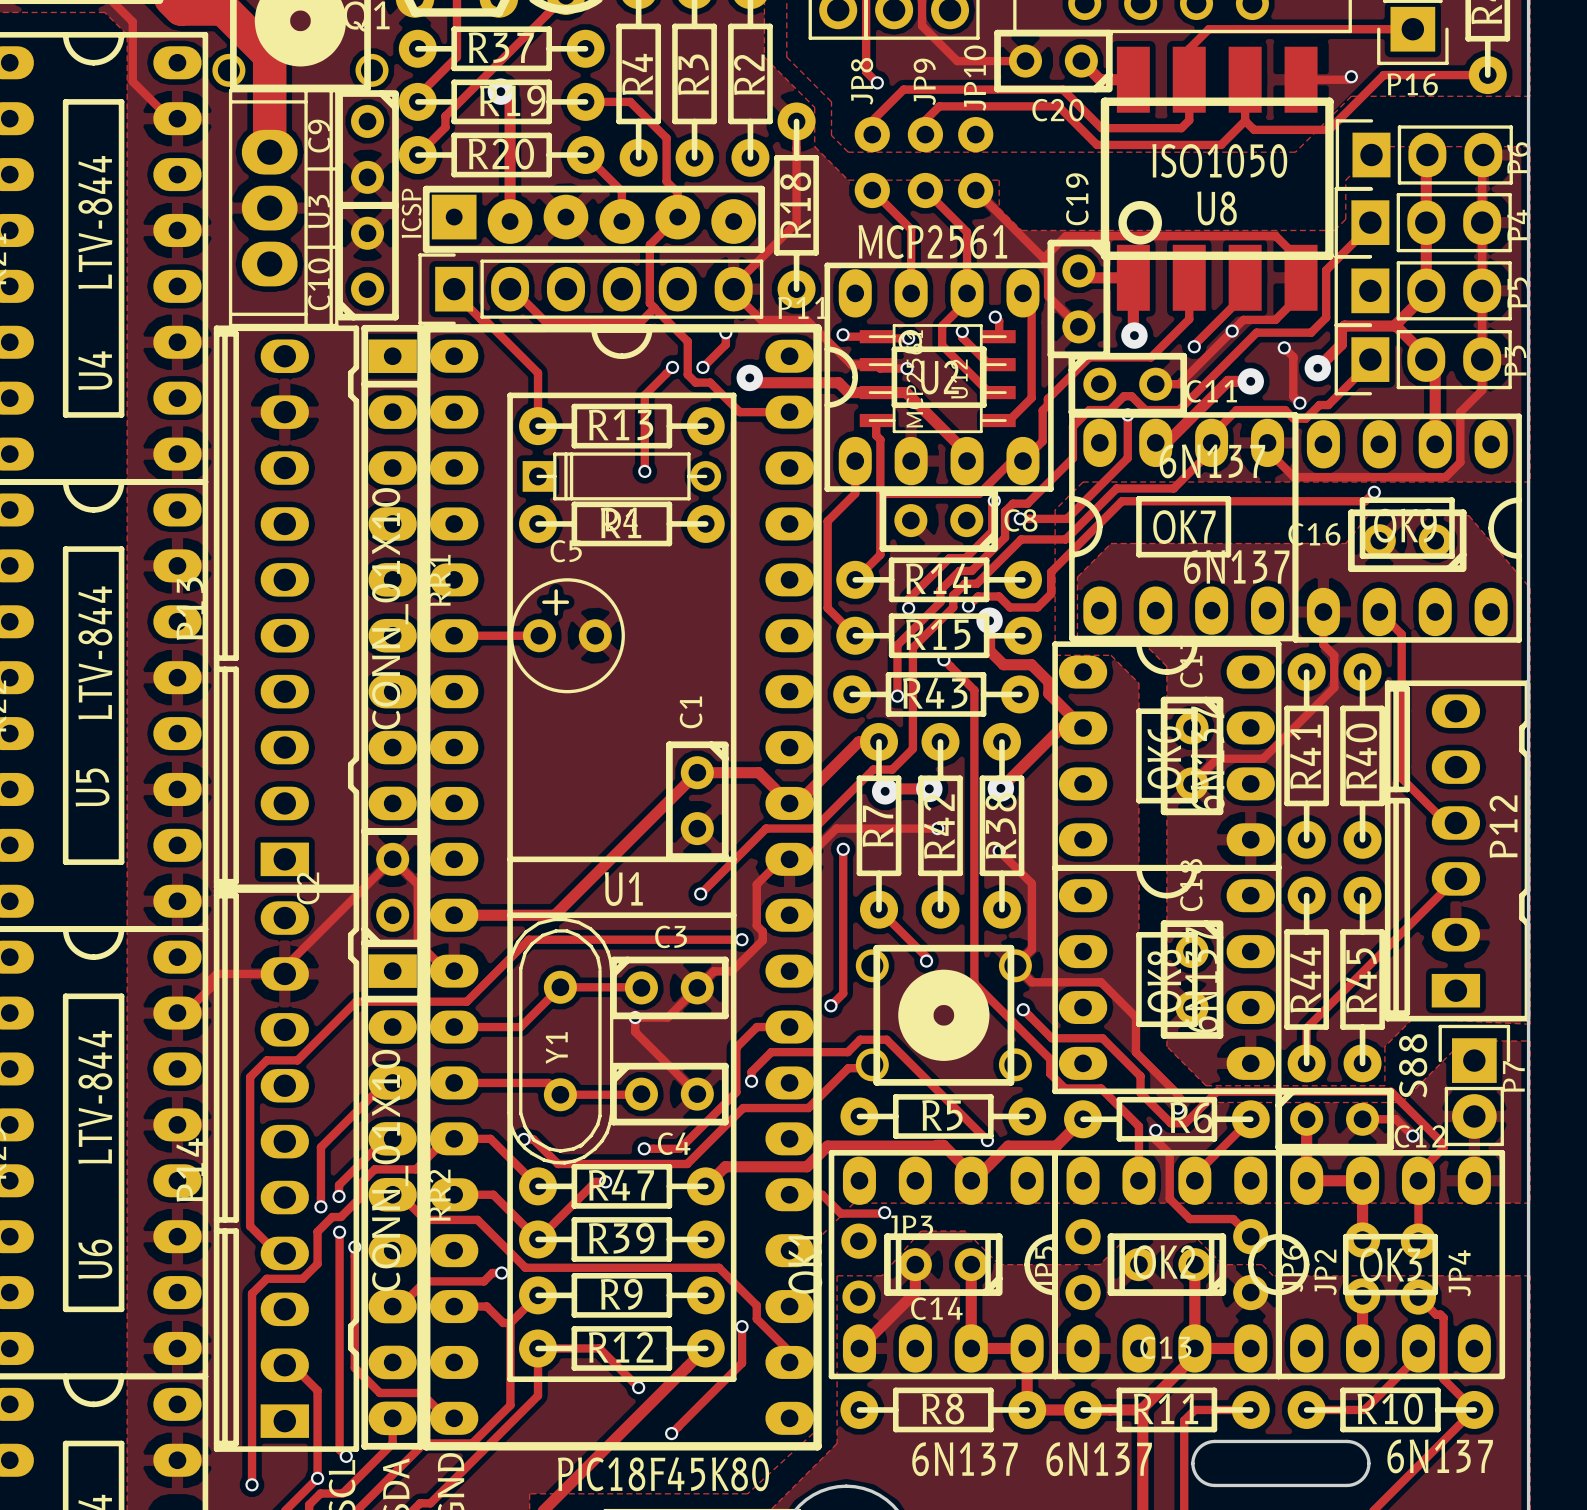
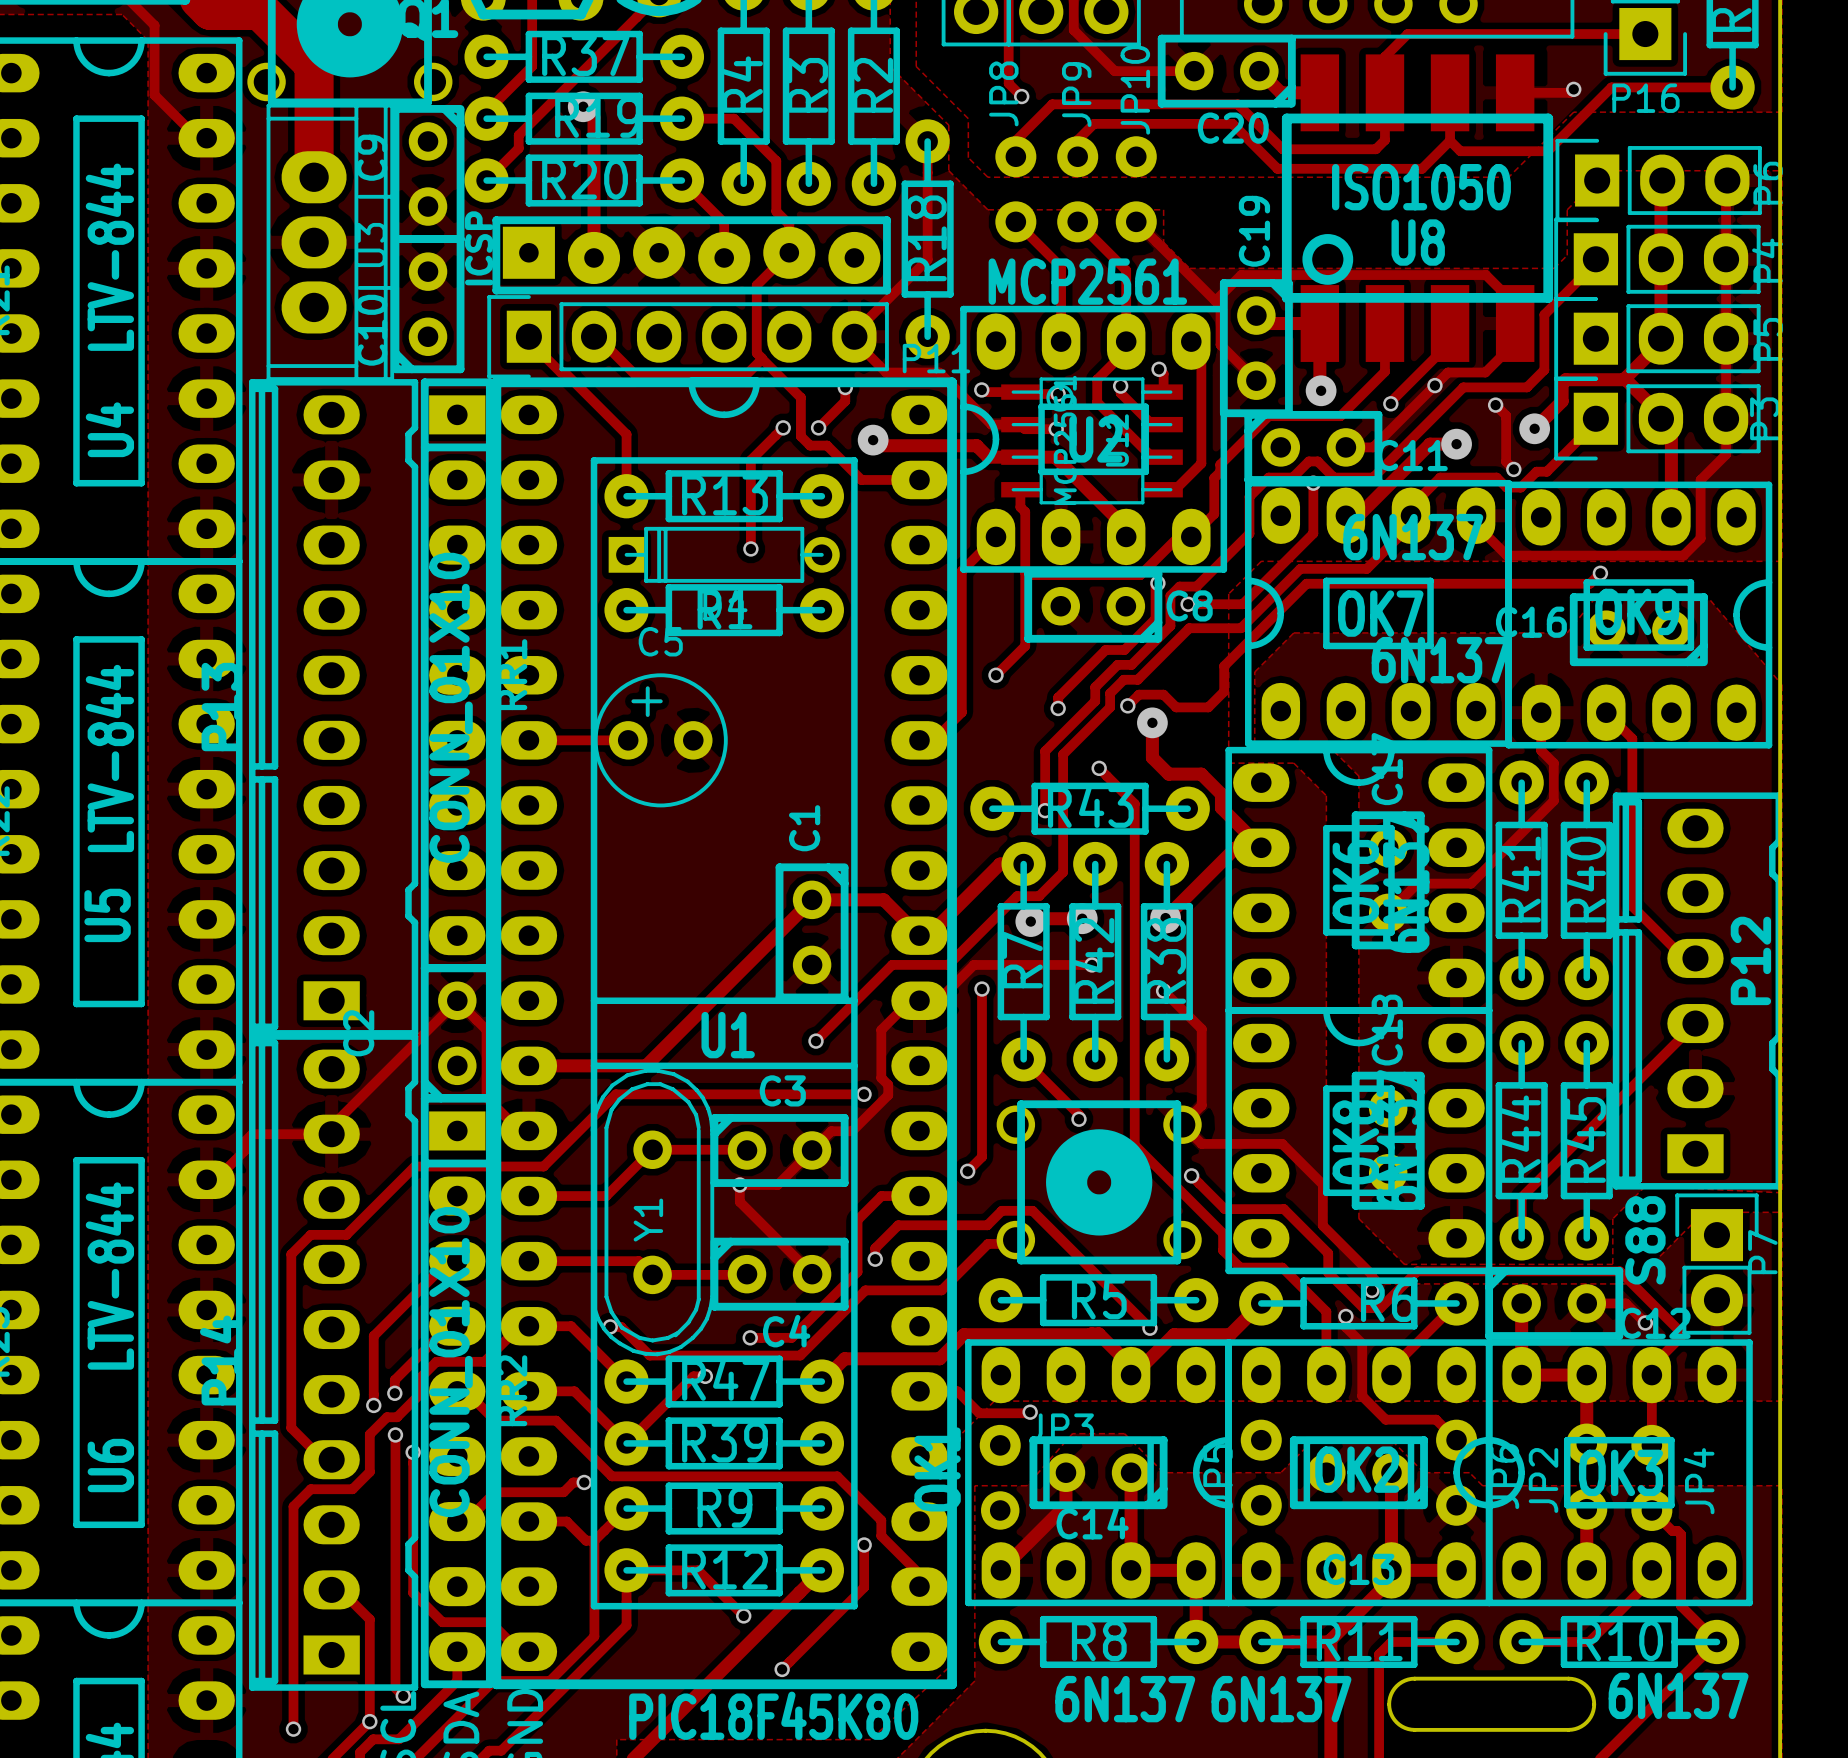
track: (855, 461) (855, 493) (827, 521) (827, 608) (855, 635) -> (995, 536) (961, 571) (961, 712) (933, 740) (919, 740)
via: none -> (995, 675)
R14: (939, 579) -> none
R15: (939, 635) -> none

